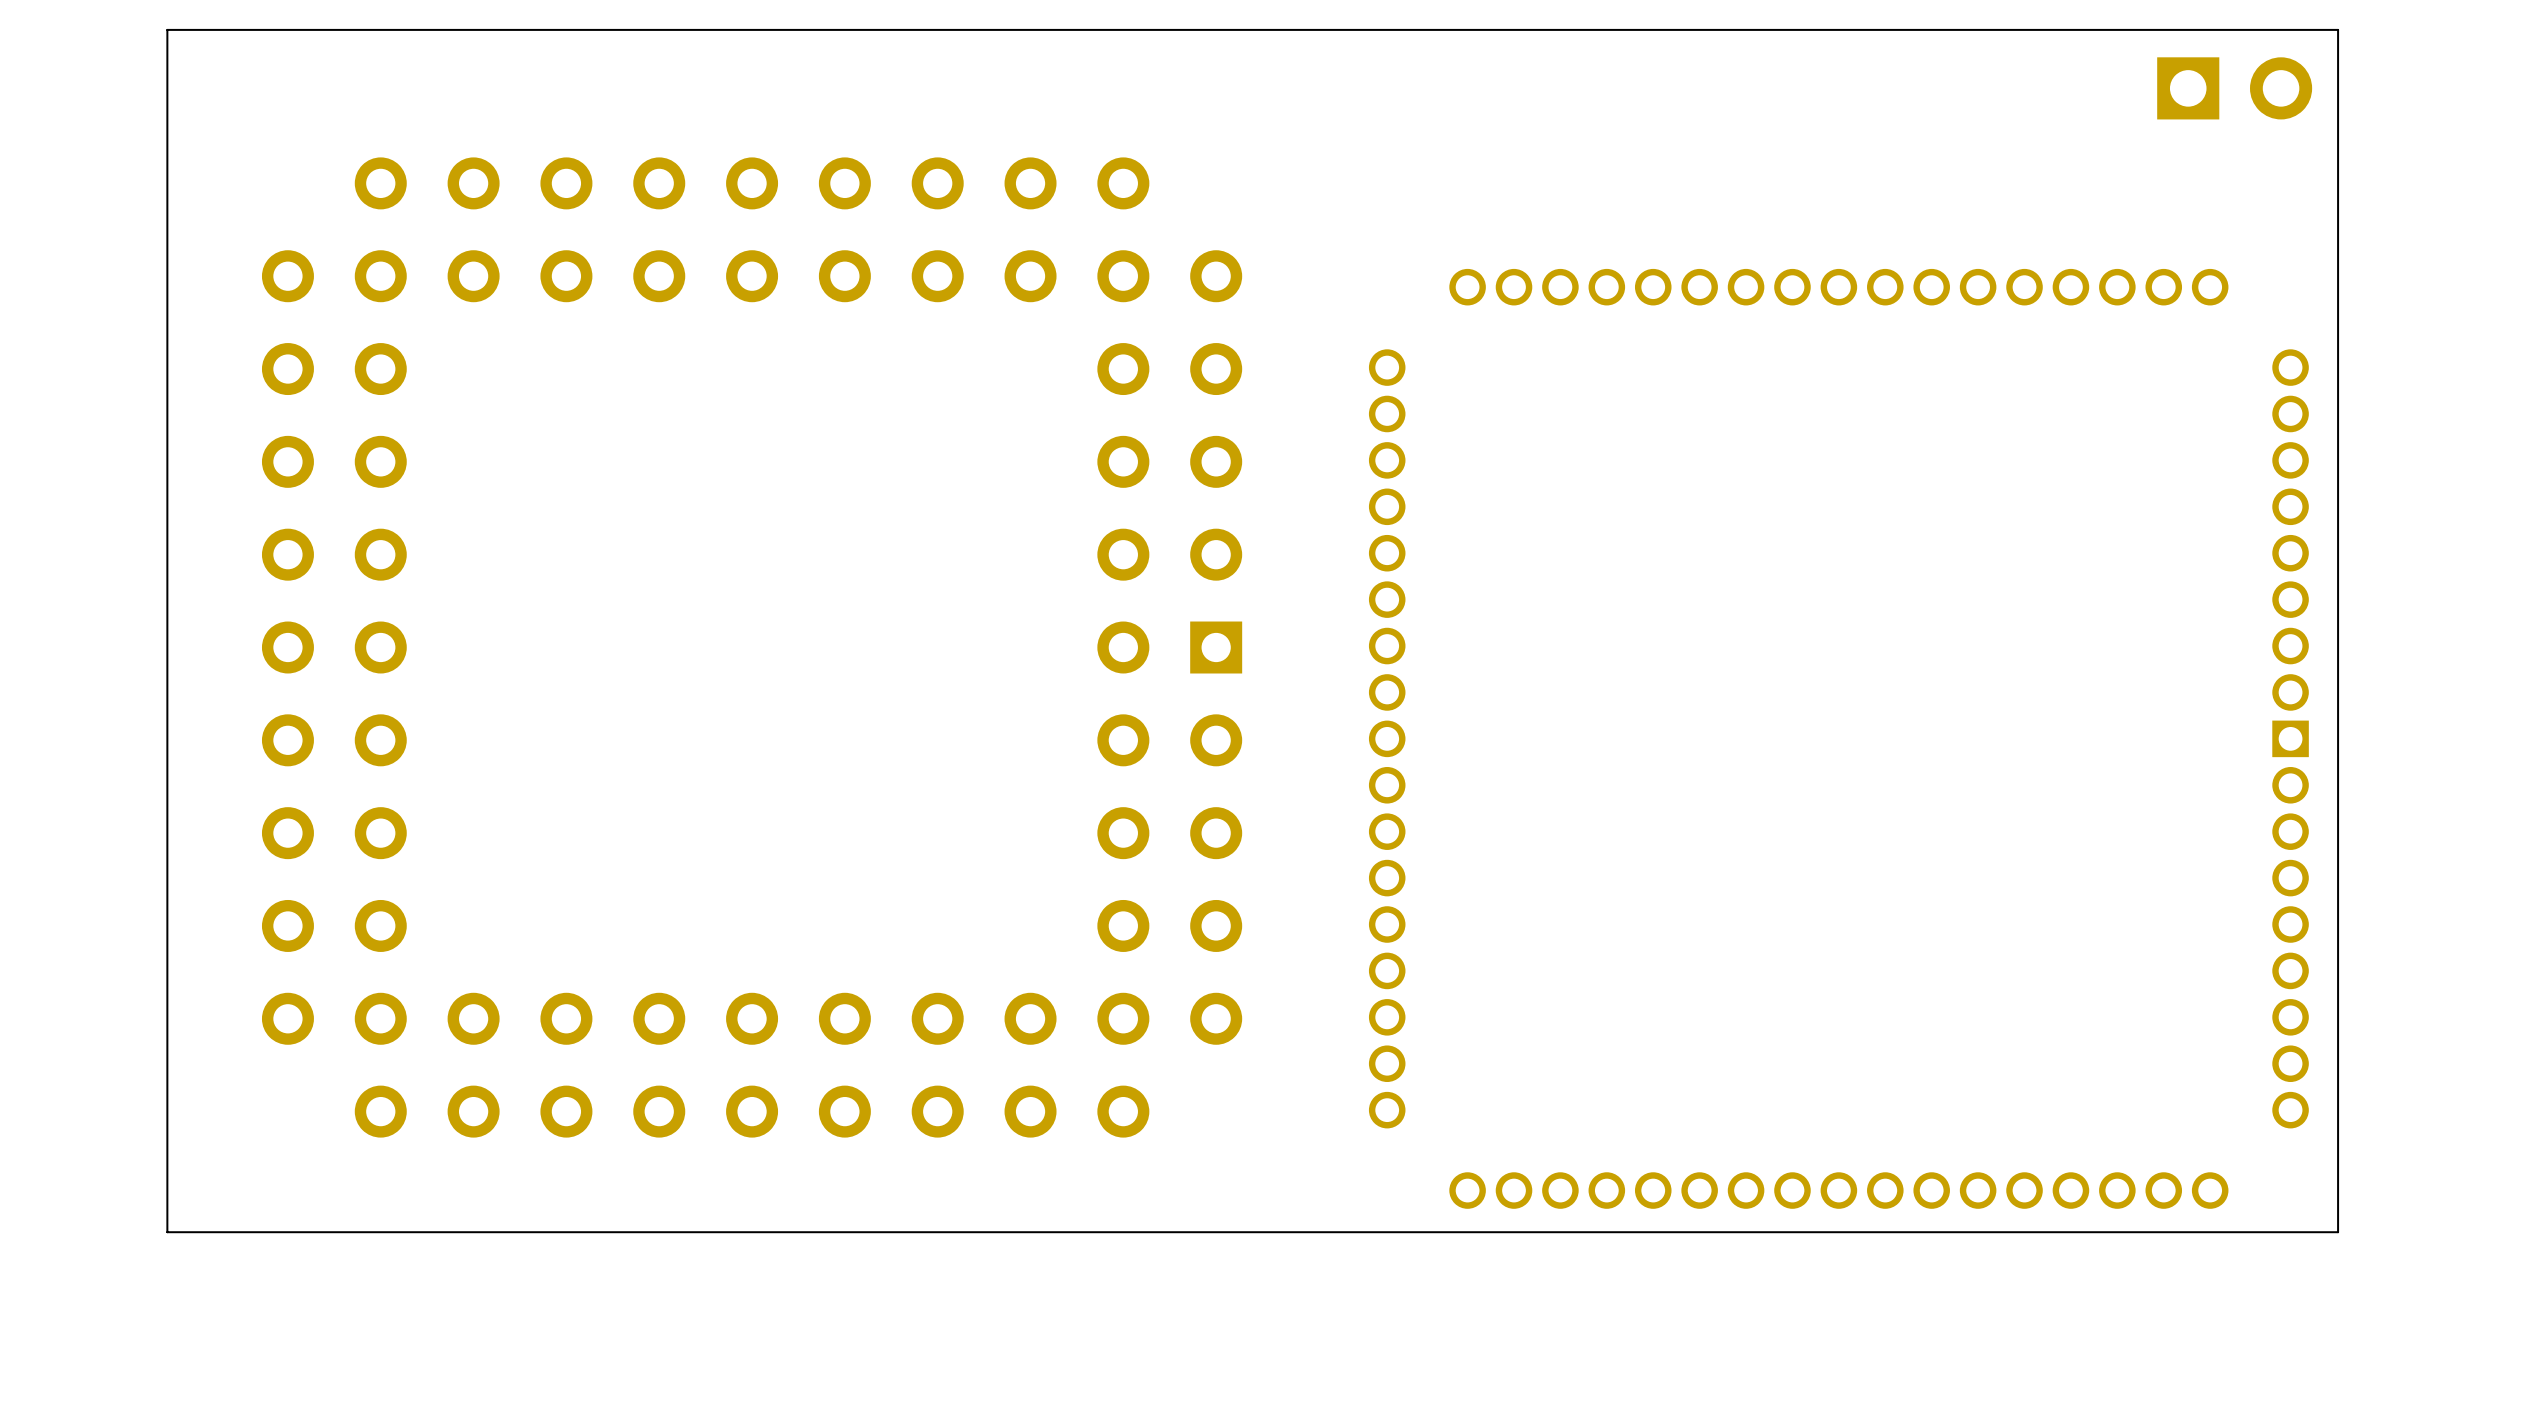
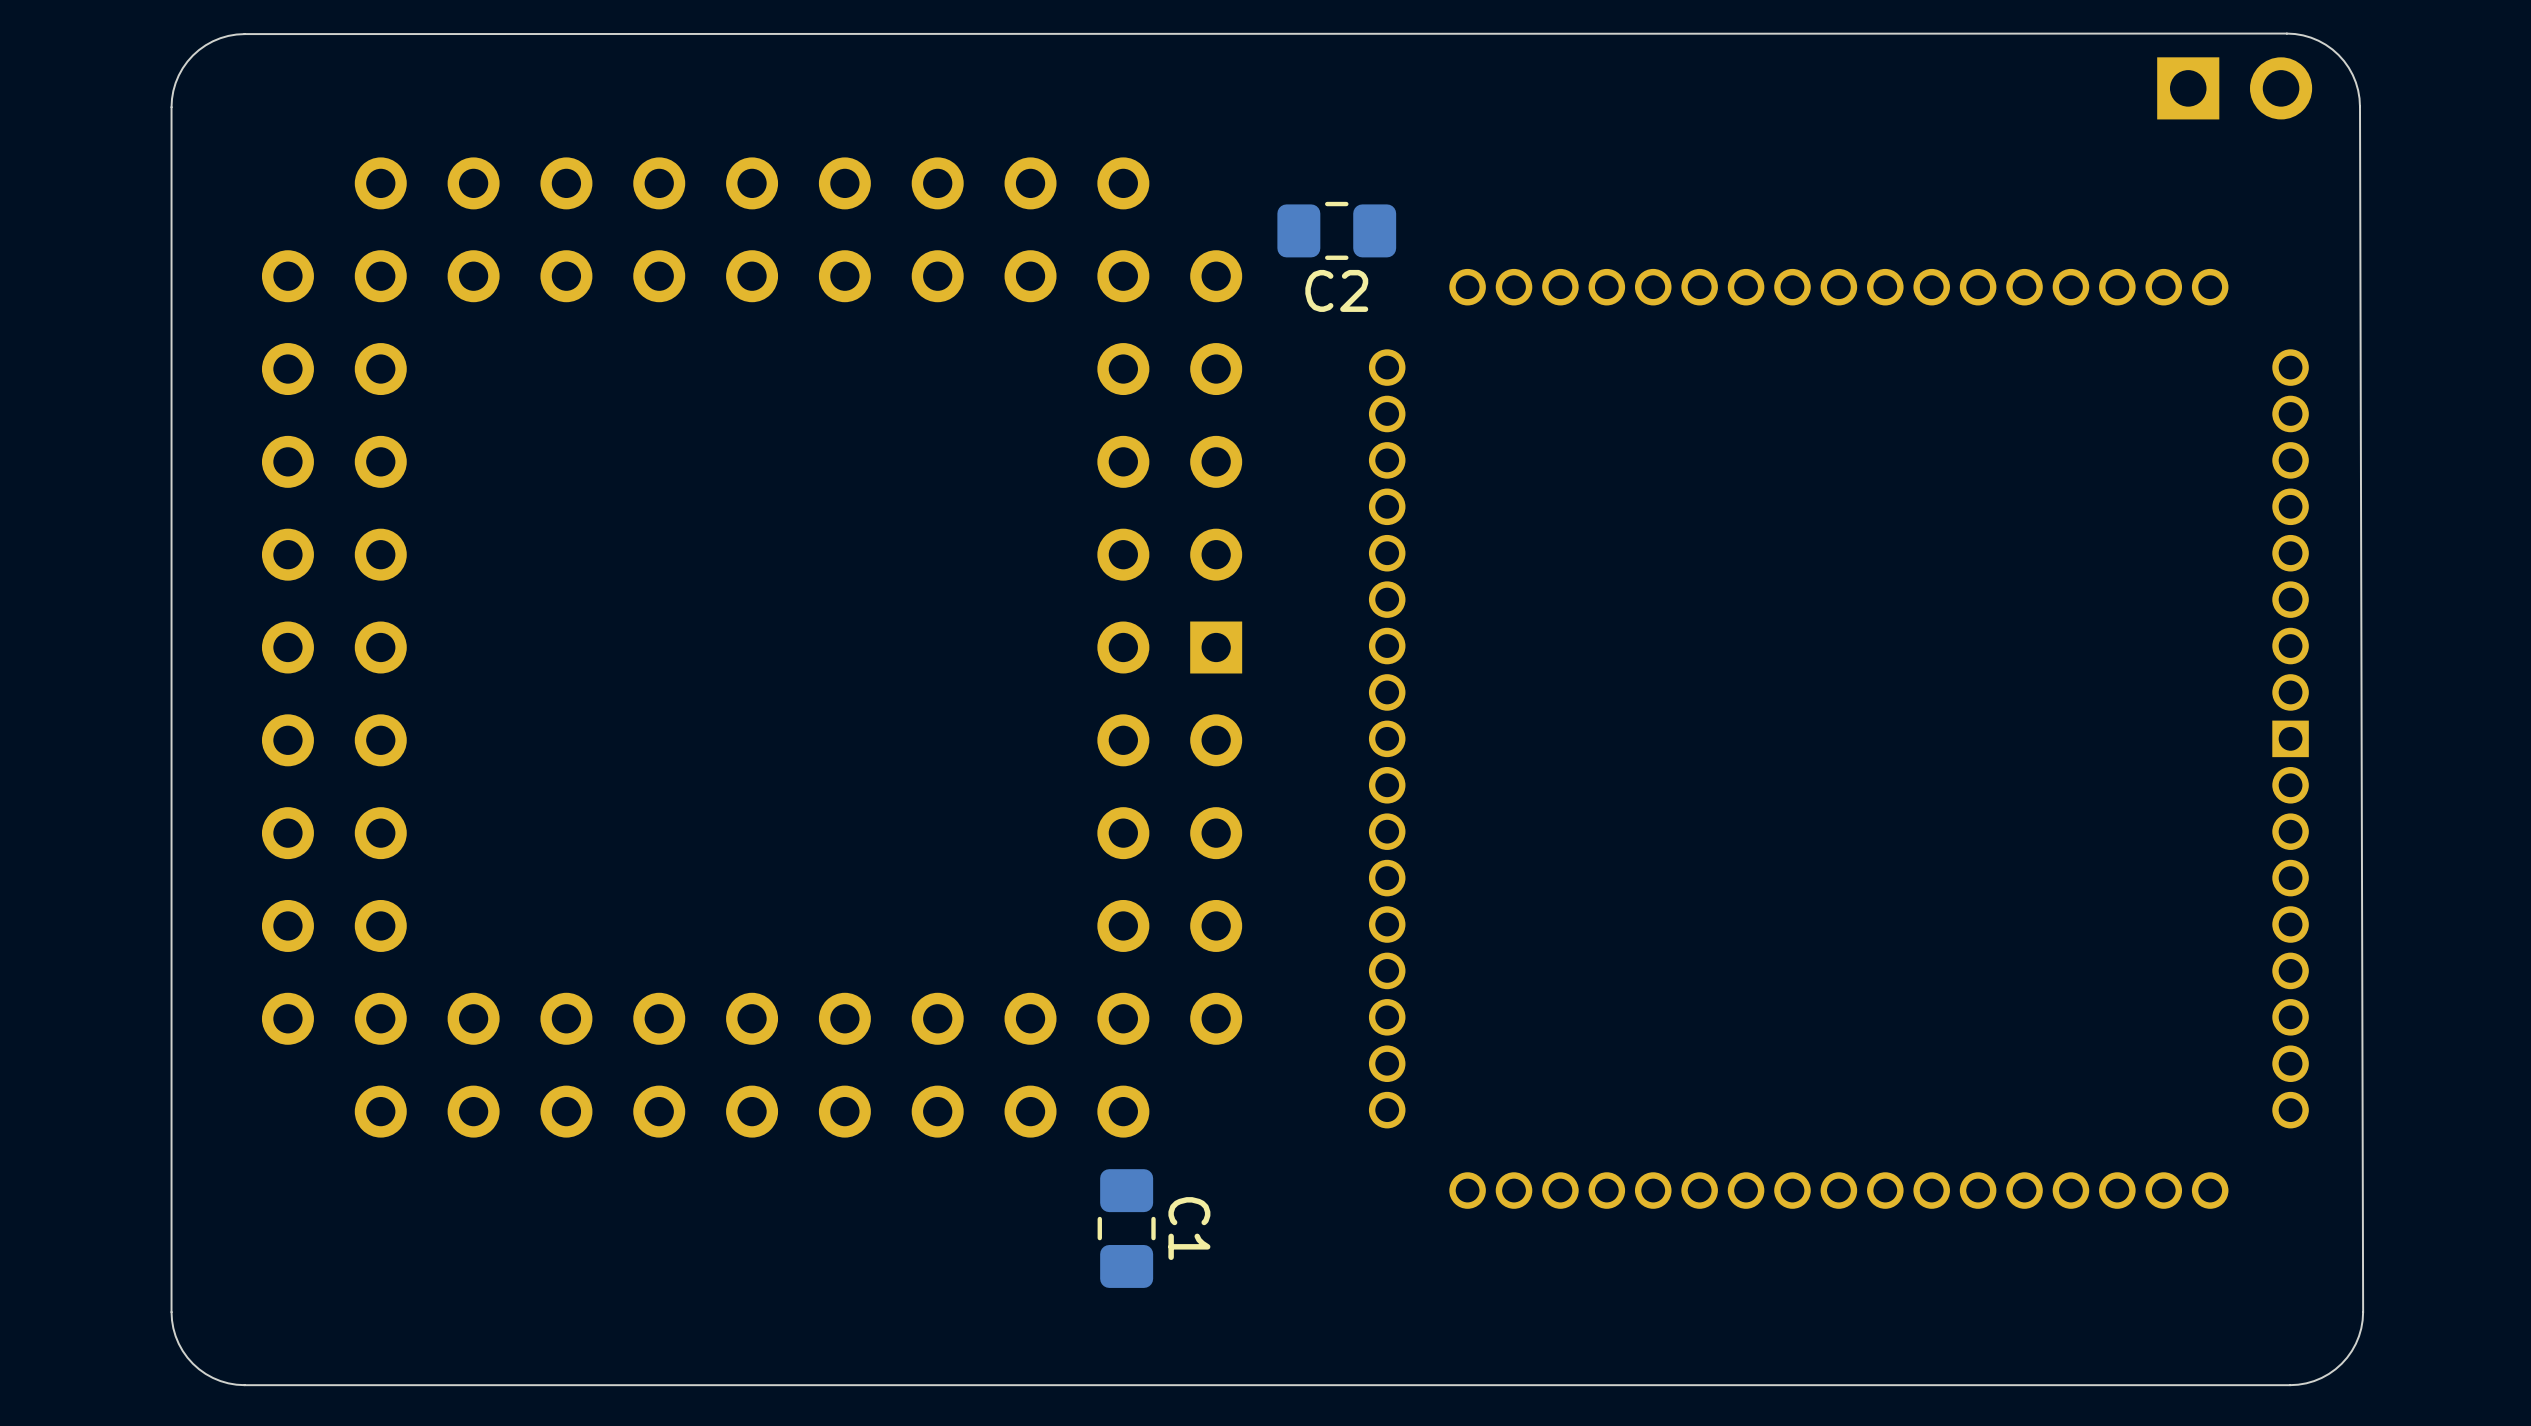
board edge: (2338, 29) (2338, 1232) (167, 1232) (167, 29) (2338, 29) -> (2286, 33) (2311, 37) (2325, 44) (2338, 54) (2352, 74) (2358, 90) (2360, 106) (2363, 1312) (2359, 1336) (2351, 1350) (2341, 1363) (2328, 1373) (2314, 1381) (2290, 1385) (244, 1385) (220, 1381) (205, 1373) (192, 1363) (182, 1350) (173, 1328) (171, 1312) (171, 107) (175, 83) (182, 68) (192, 55) (205, 45) (220, 38) (244, 34) (2286, 33)
C2: none -> (1336, 230)
C1: none -> (1126, 1228)

